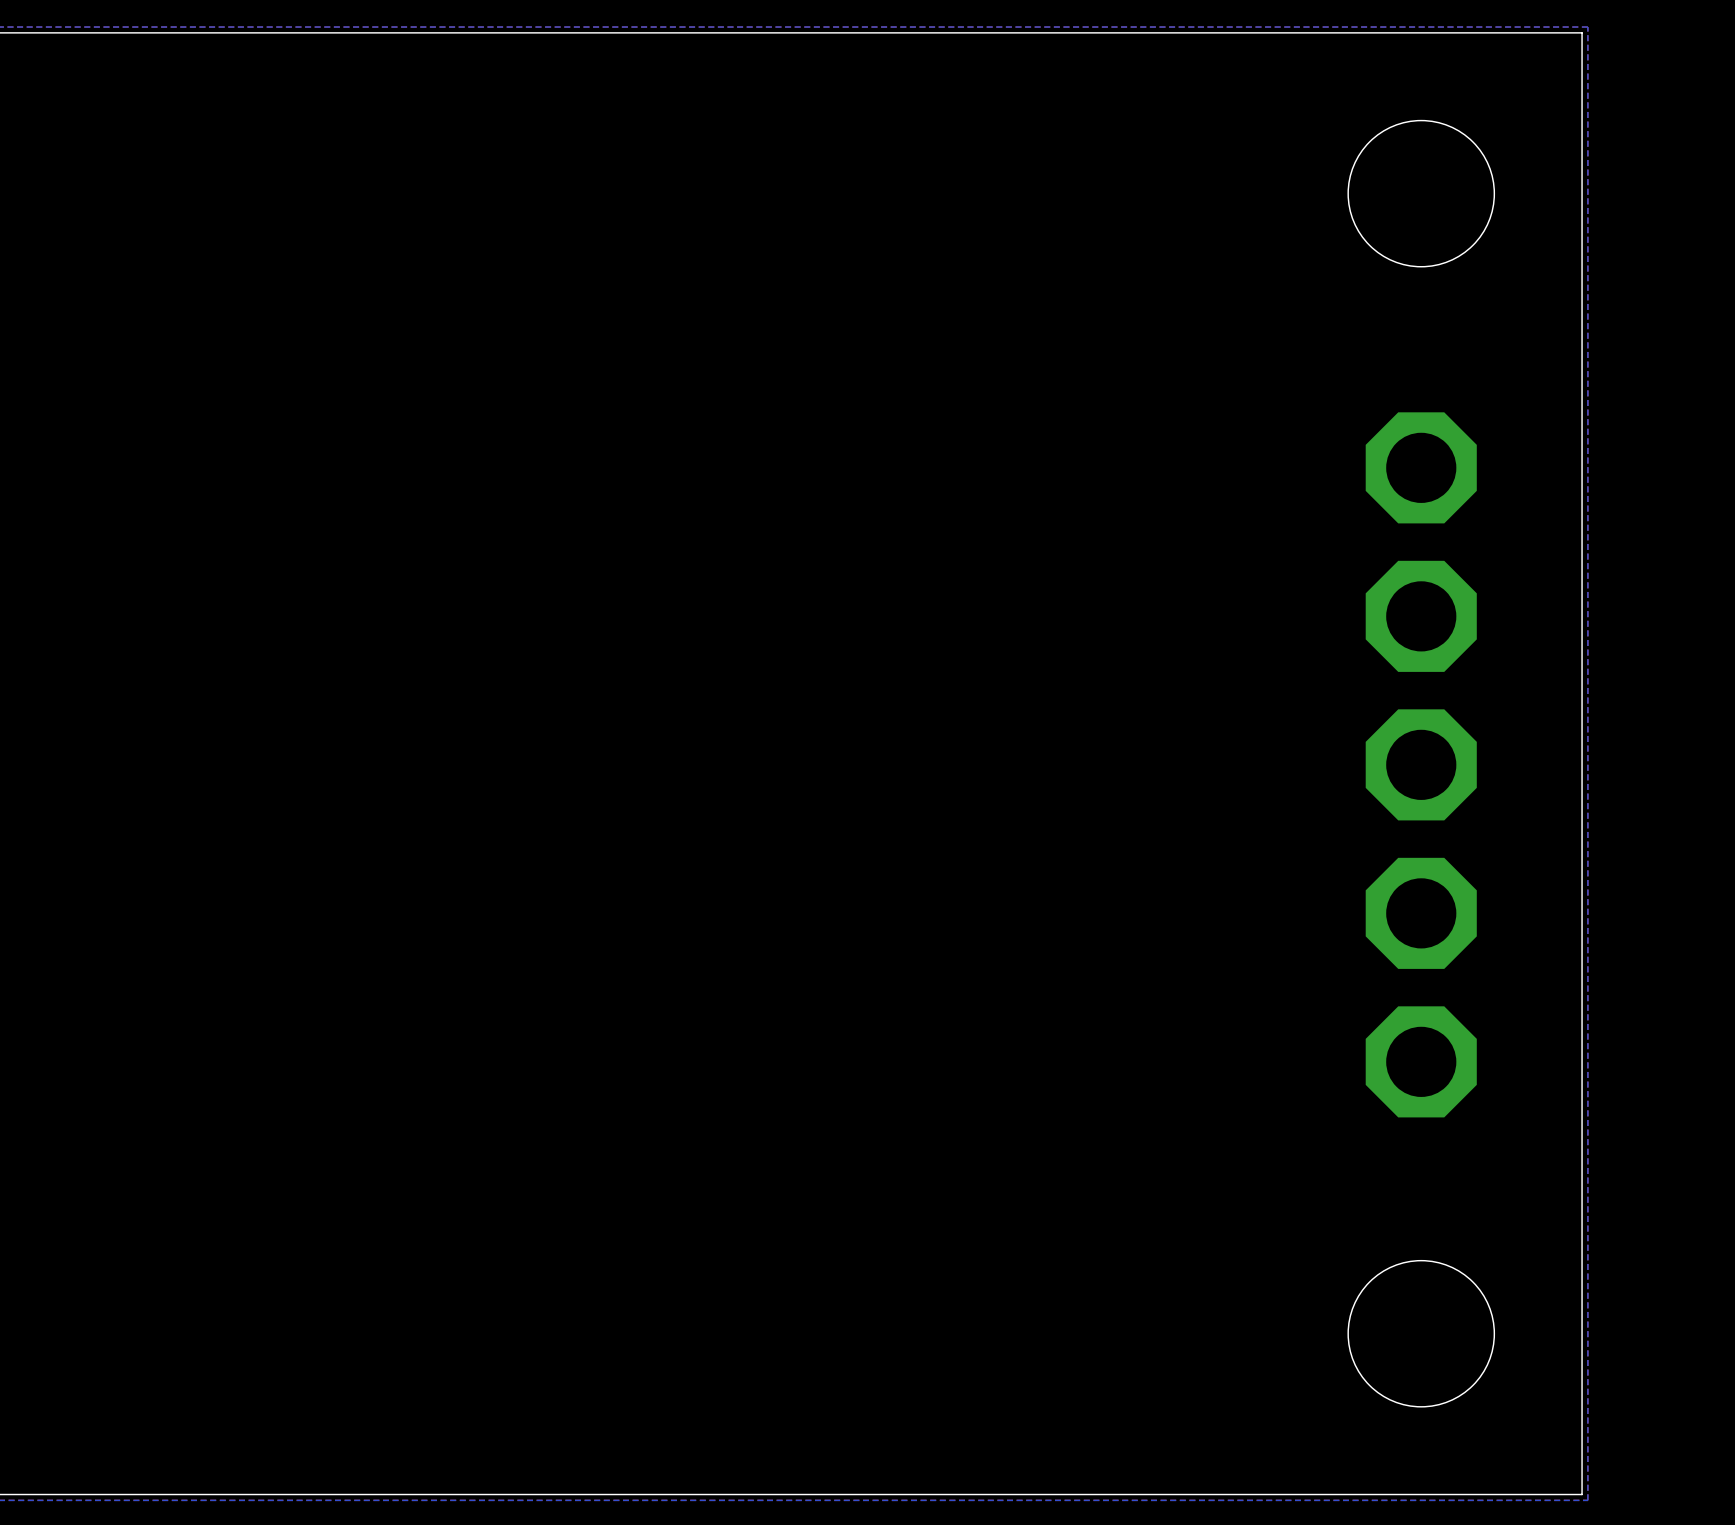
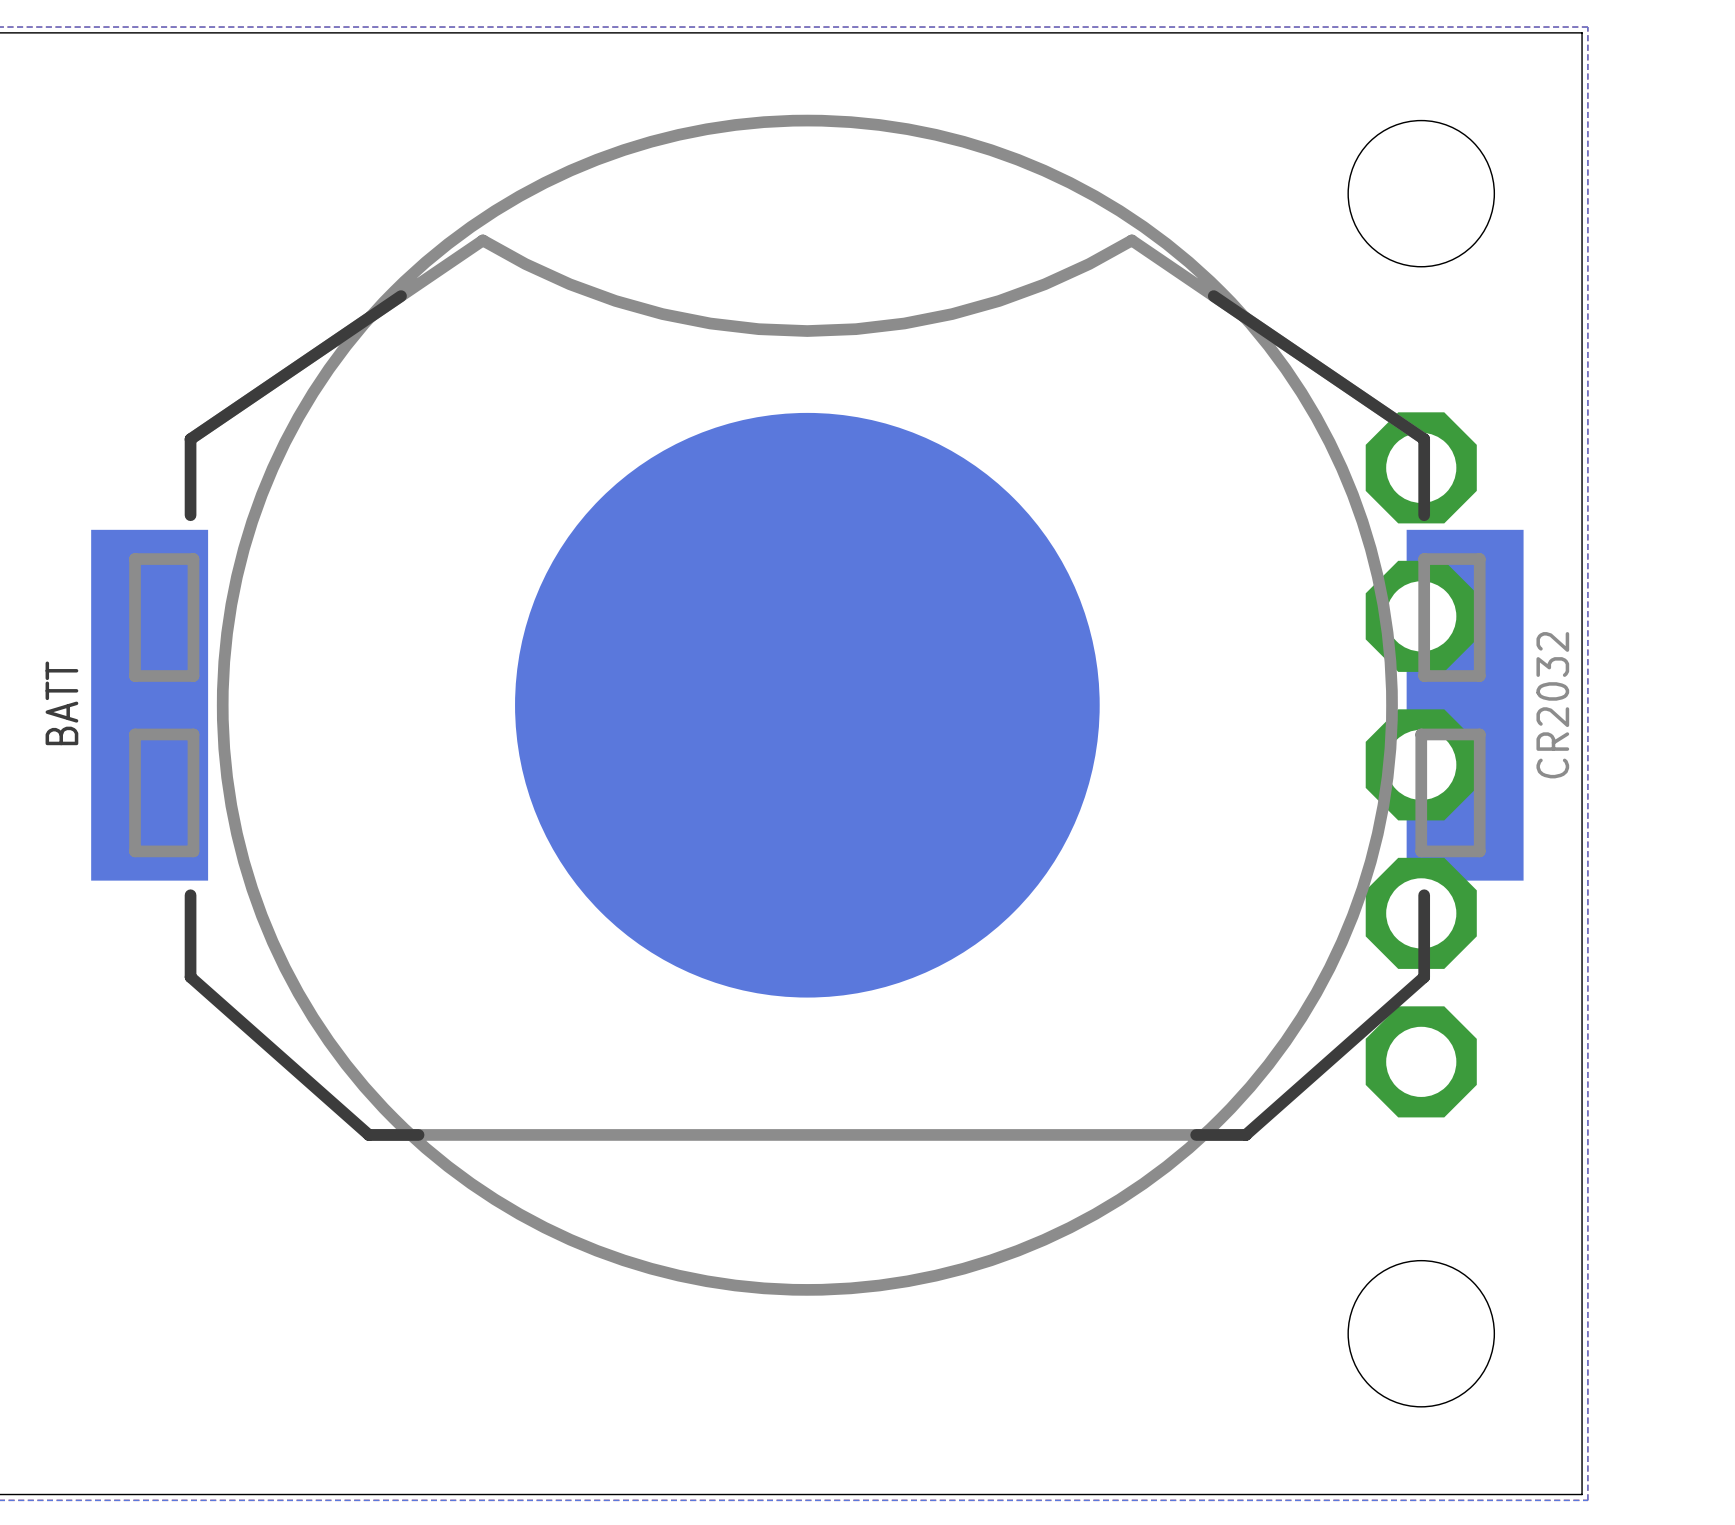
BATT: none -> CR2032 (807, 705)

